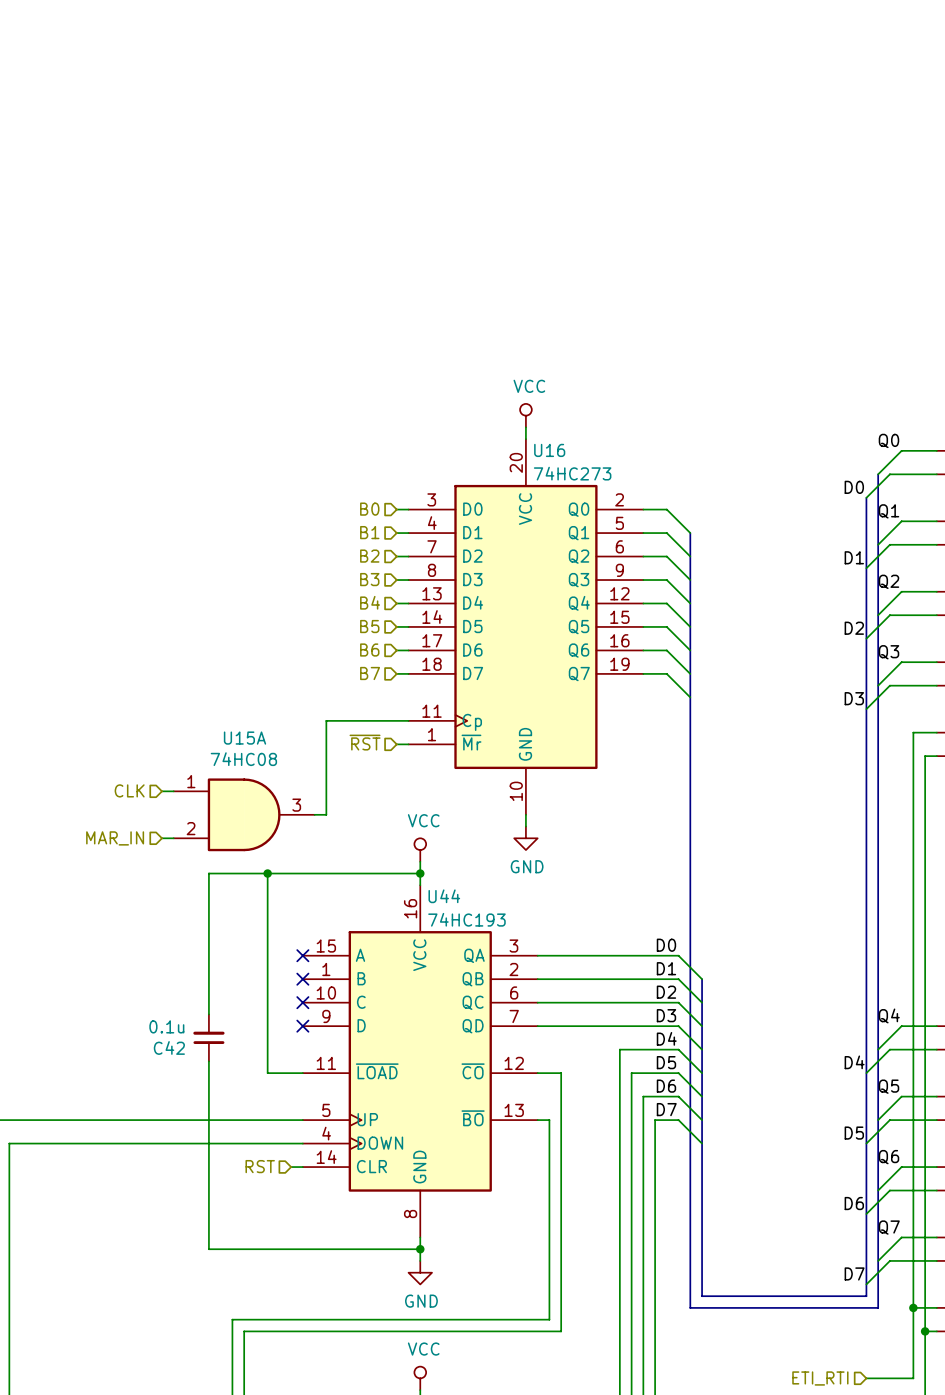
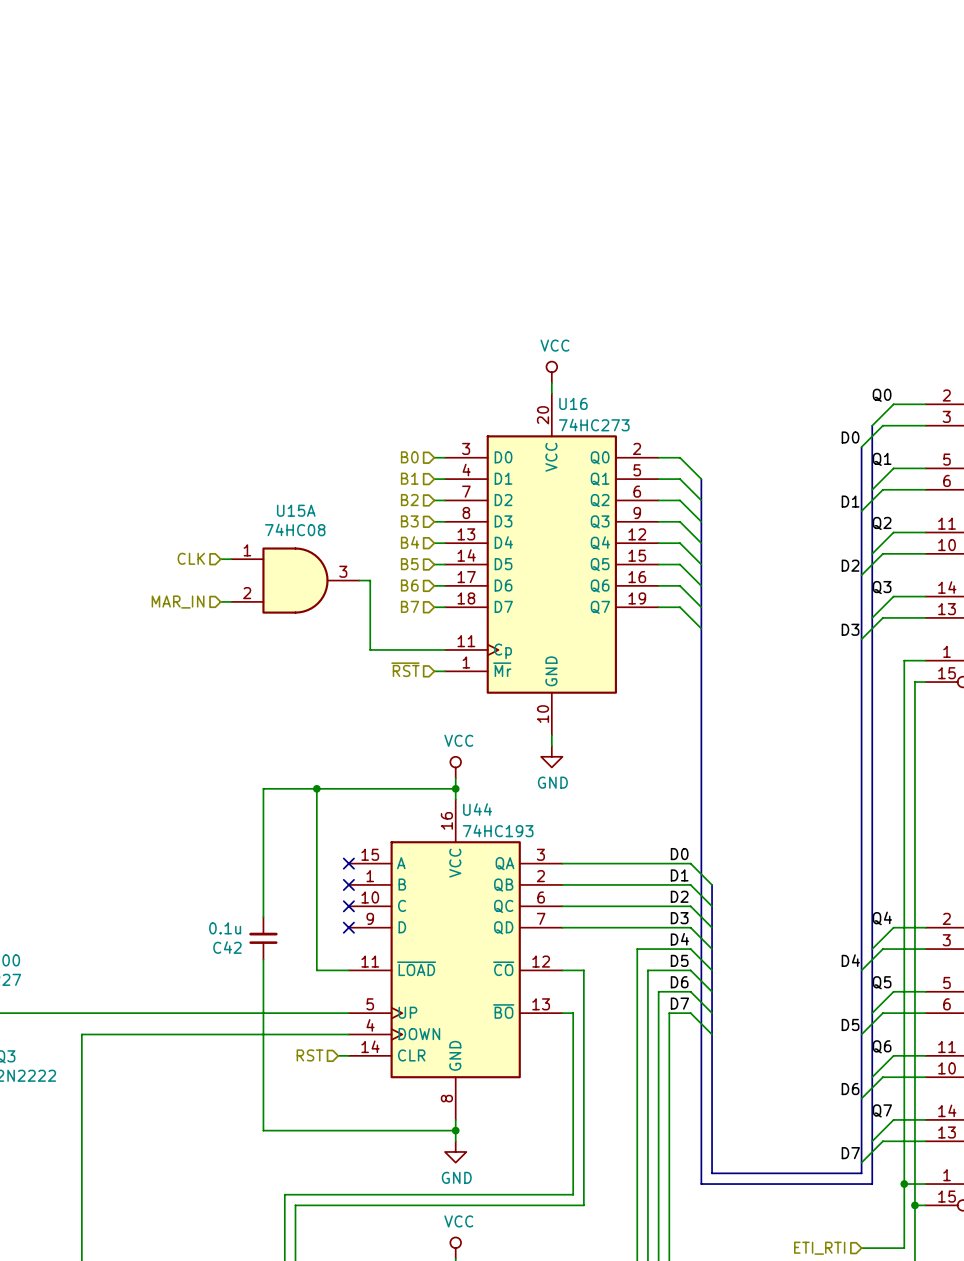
wire: (326, 720) (326, 814) (314, 814) -> (370, 649) (370, 580) (359, 580)
hierarchical label position: CLK (129, 790) -> CLK (191, 558)
wire: (161, 791) (173, 791) -> (220, 601) (231, 601)
U15A position: (244, 814) -> (295, 580)
hierarchical label position: MAR_IN (115, 838) -> MAR_IN (178, 602)
wire: (161, 838) (173, 838) -> (220, 559) (231, 559)

